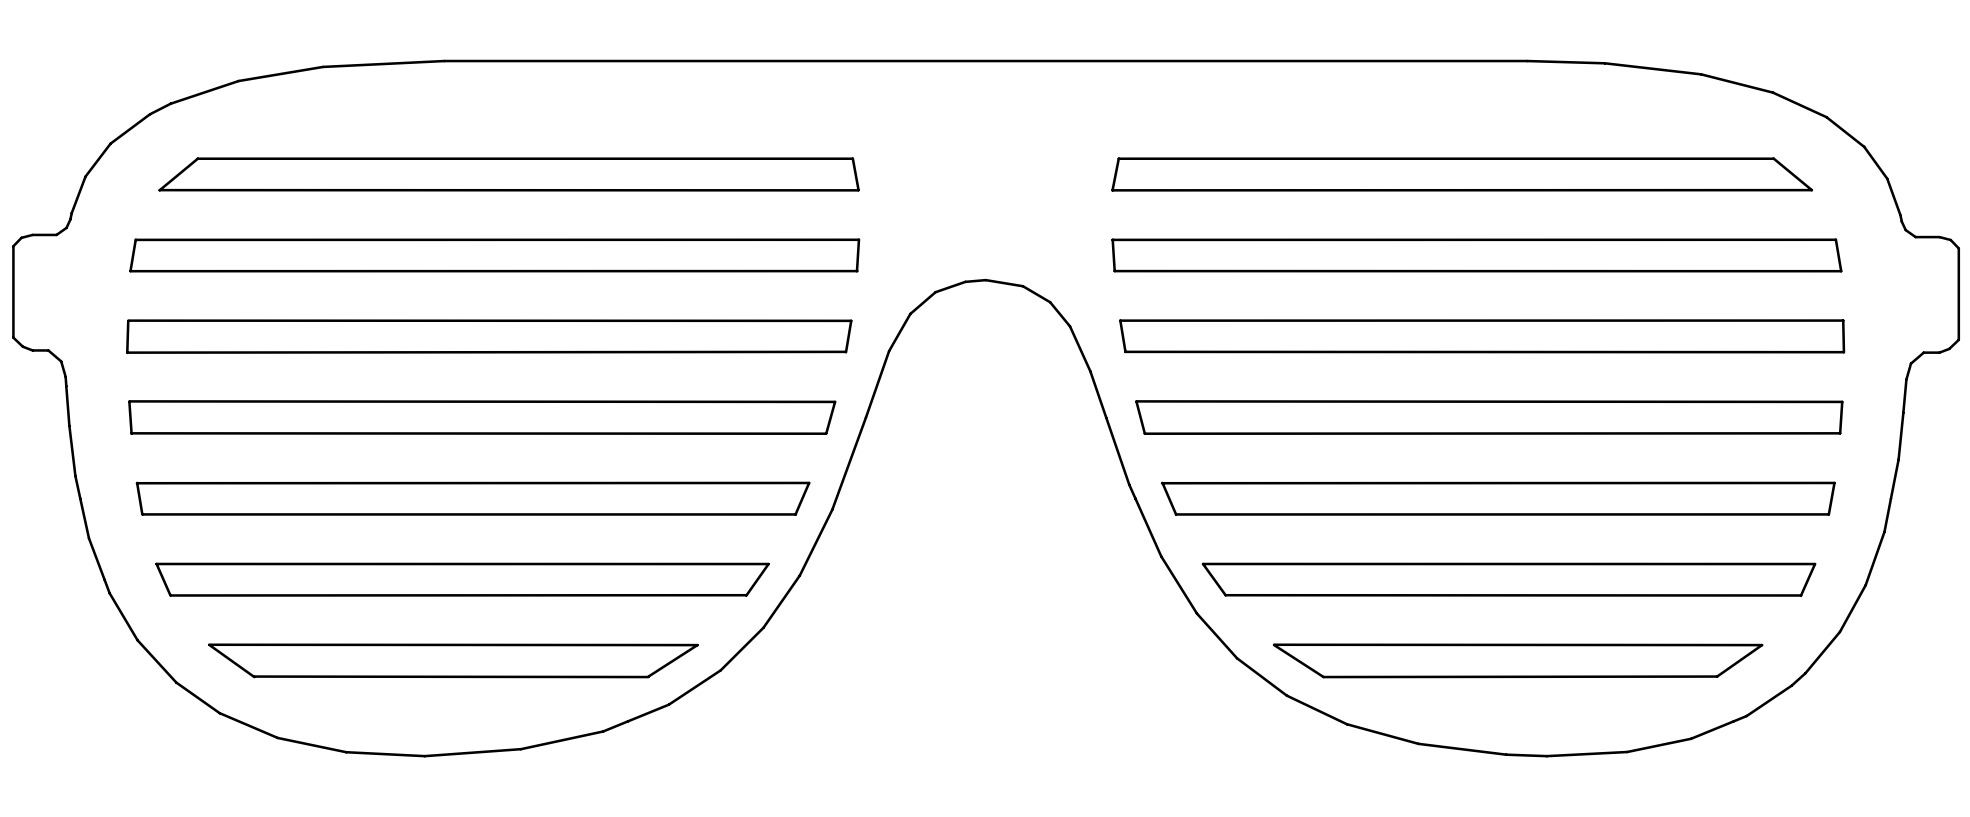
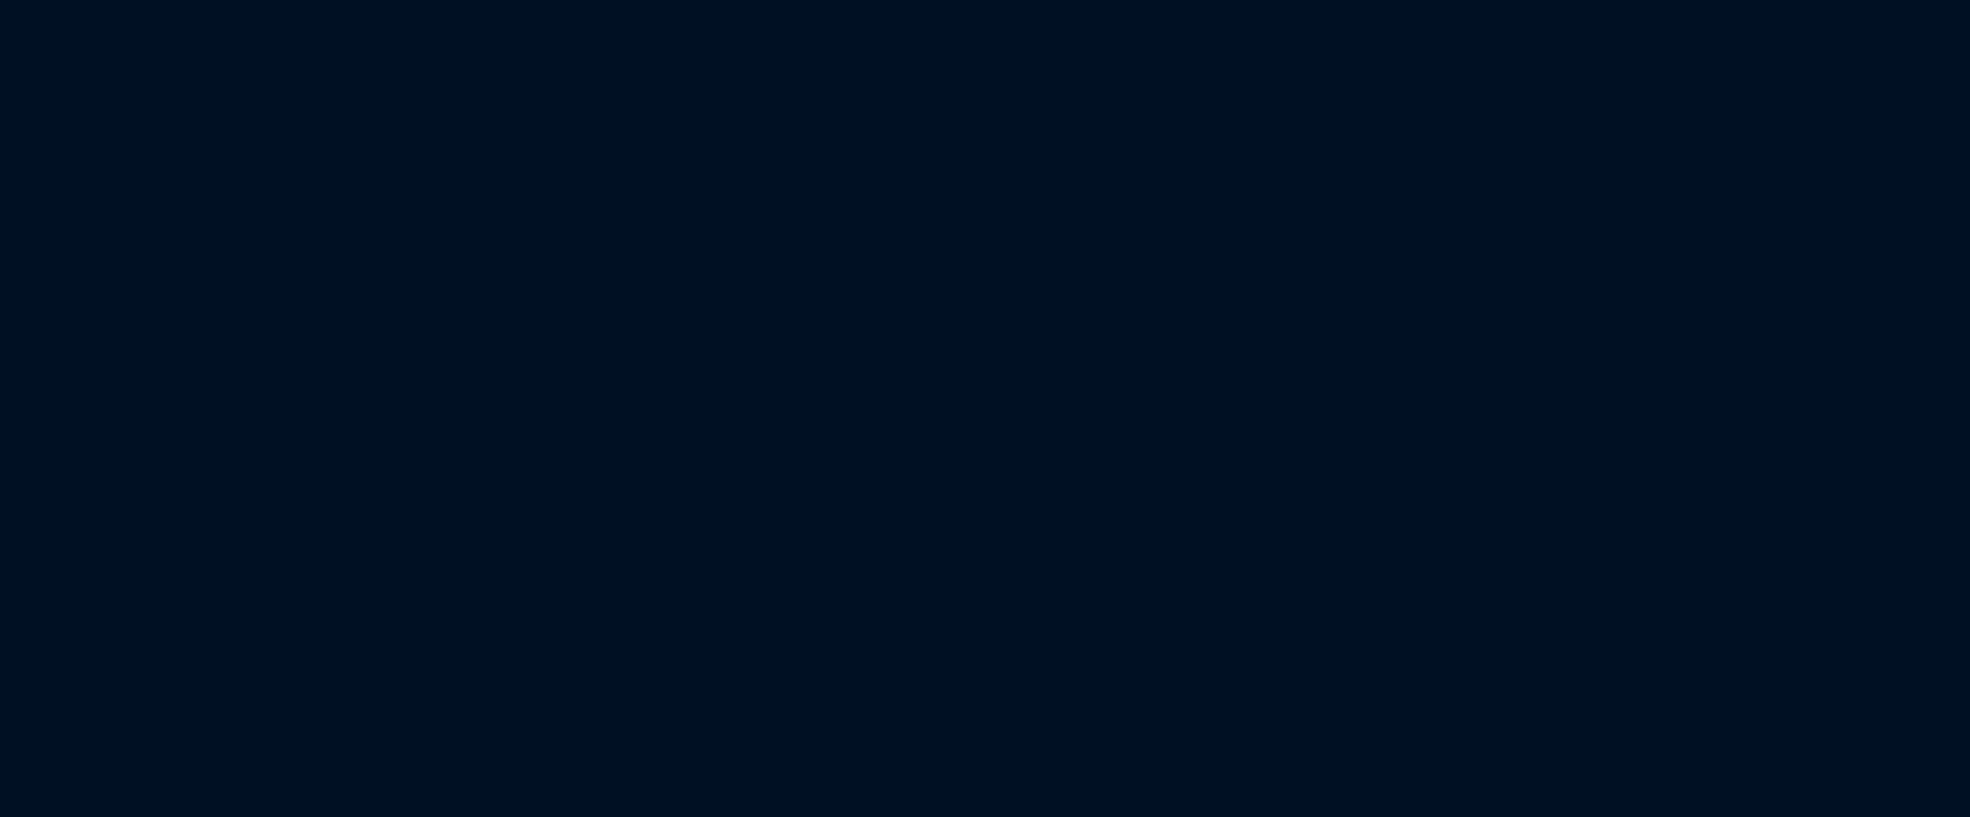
board edge: (1773, 158) (1118, 158) (1112, 190) (1811, 190) (1773, 158) -> none
board edge: (159, 190) (858, 190) -> none
board edge: (858, 190) (852, 158) (197, 158) (159, 190) -> none
board edge: (1900, 214) (1887, 178) (1864, 146) (1826, 117) (1772, 92) (1701, 74) (1604, 63) (1527, 61) (444, 61) (323, 66) (238, 81) (170, 103) (150, 114) (110, 143) (85, 176) (66, 227) -> none
board edge: (1900, 215) (1905, 229) -> none
board edge: (66, 227) (56, 234) (32, 234) -> none
board edge: (1905, 230) (1915, 237) (1939, 237) -> none
board edge: (32, 234) (21, 237) (13, 246) -> none
board edge: (1939, 237) (1950, 240) (1958, 248) -> none
board edge: (135, 239) (130, 271) -> none
board edge: (135, 239) (858, 239) (856, 271) -> none
board edge: (1112, 239) (1114, 271) (1841, 271) (1835, 239) (1112, 239) -> none
board edge: (13, 246) (13, 337) -> none
board edge: (1958, 248) (1958, 339) -> none
board edge: (857, 271) (130, 271) -> none
board edge: (128, 320) (851, 320) (846, 352) -> none
board edge: (1120, 320) (1843, 320) (1843, 352) (1125, 351) (1120, 320) -> none
board edge: (128, 321) (127, 352) -> none
board edge: (13, 337) (22, 346) -> none
board edge: (1958, 339) (1949, 348) (1939, 352) -> none
board edge: (22, 346) (32, 350) -> none
board edge: (48, 350) (32, 350) -> none
board edge: (48, 350) (61, 361) (65, 376) -> none
board edge: (845, 351) (127, 352) -> none
board edge: (1923, 352) (1910, 363) (1906, 379) -> none
board edge: (1939, 352) (1923, 352) -> none
board edge: (65, 377) (75, 476) (88, 538) (109, 593) (137, 640) (176, 682) (219, 713) (277, 737) (346, 752) (424, 756) (520, 749) (603, 731) (668, 704) (720, 670) (763, 627) (799, 575) (832, 509) (889, 351) (910, 313) (935, 292) (965, 281) (985, 280) (1022, 286) (1050, 302) (1070, 326) (1090, 371) (1135, 498) -> none
board edge: (1906, 379) (1898, 459) (1884, 531) (1865, 585) (1839, 631) (1805, 673) (1791, 685) (1746, 716) (1691, 738) (1627, 752) (1546, 756) (1506, 754) (1418, 743) (1346, 724) (1286, 695) (1237, 658) (1196, 613) (1161, 556) (1135, 498) -> none
board edge: (129, 401) (835, 401) (826, 433) -> none
board edge: (129, 401) (131, 433) -> none
board edge: (1136, 401) (1842, 401) (1840, 433) (1144, 433) (1136, 401) -> none
board edge: (131, 433) (826, 433) -> none
board edge: (137, 482) (142, 514) -> none
board edge: (1162, 482) (1176, 514) (1828, 514) (1834, 482) (1162, 483) -> none
board edge: (136, 483) (809, 482) (795, 514) -> none
board edge: (795, 514) (142, 514) -> none
board edge: (156, 564) (768, 564) (746, 595) -> none
board edge: (156, 564) (170, 595) -> none
board edge: (1202, 564) (1815, 564) (1801, 595) (1225, 595) (1203, 564) -> none
board edge: (746, 595) (170, 595) -> none
board edge: (209, 644) (697, 645) (648, 676) -> none
board edge: (1274, 644) (1762, 645) (1717, 676) (1323, 677) (1274, 645) -> none
board edge: (209, 645) (254, 677) -> none
board edge: (254, 676) (648, 677) -> none

